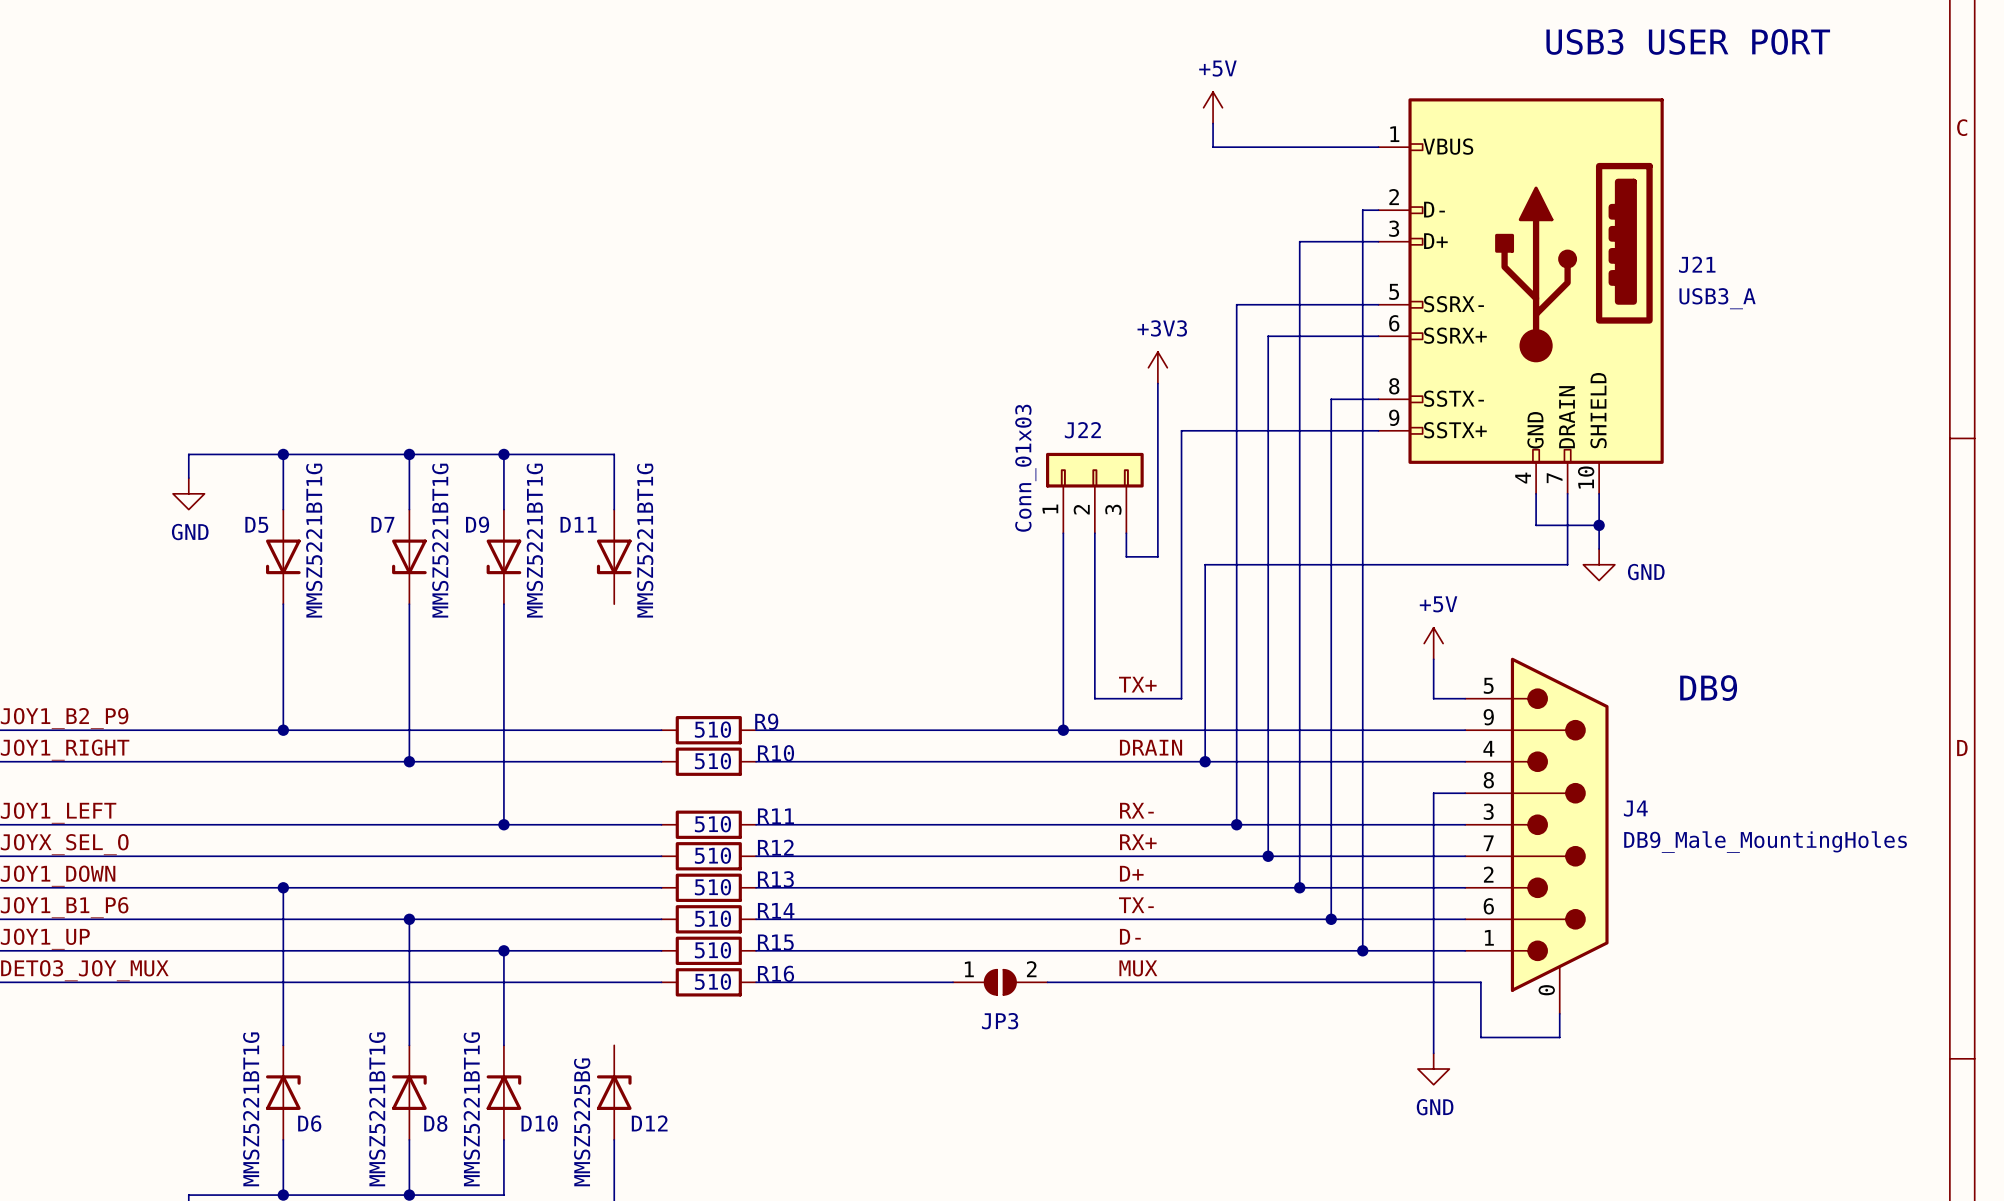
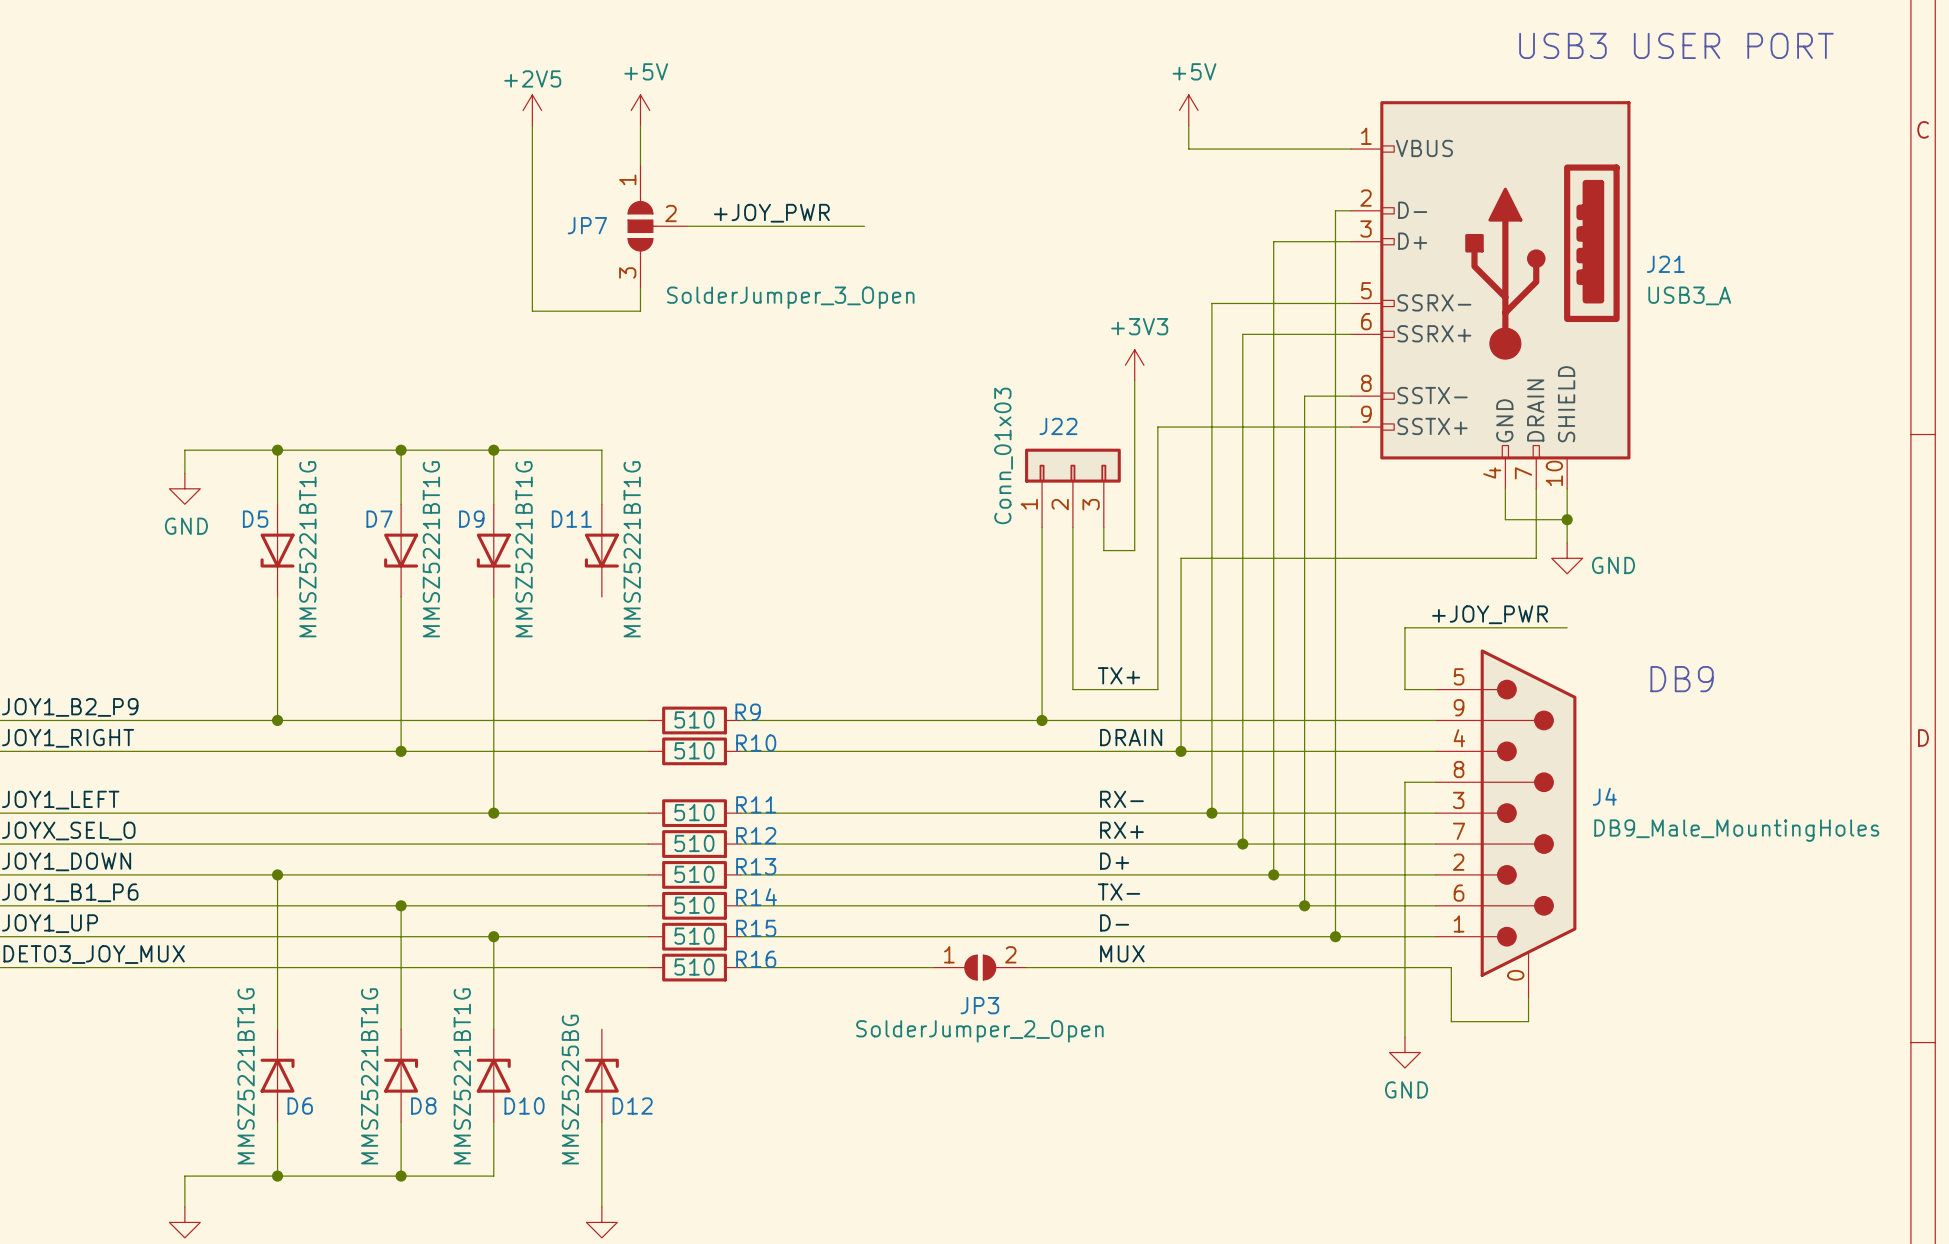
power symbol: none -> +2V5 (532, 110)
power symbol: none -> +5V (640, 110)
wire: none -> (532, 125) (532, 311) (640, 311) (640, 288)
wire: none -> (640, 125) (640, 164)
label: none -> +JOY_PWR (771, 213)
JP7: none -> SolderJumper_3_Open (657, 226)
wire: none -> (686, 226) (864, 226)
label: none -> +JOY_PWR (1490, 614)
wire: none -> (1567, 627) (1404, 627) (1404, 650)
power symbol: +5V (1433, 643) -> none
JP3 value: none -> SolderJumper_2_Open (979, 1031)

